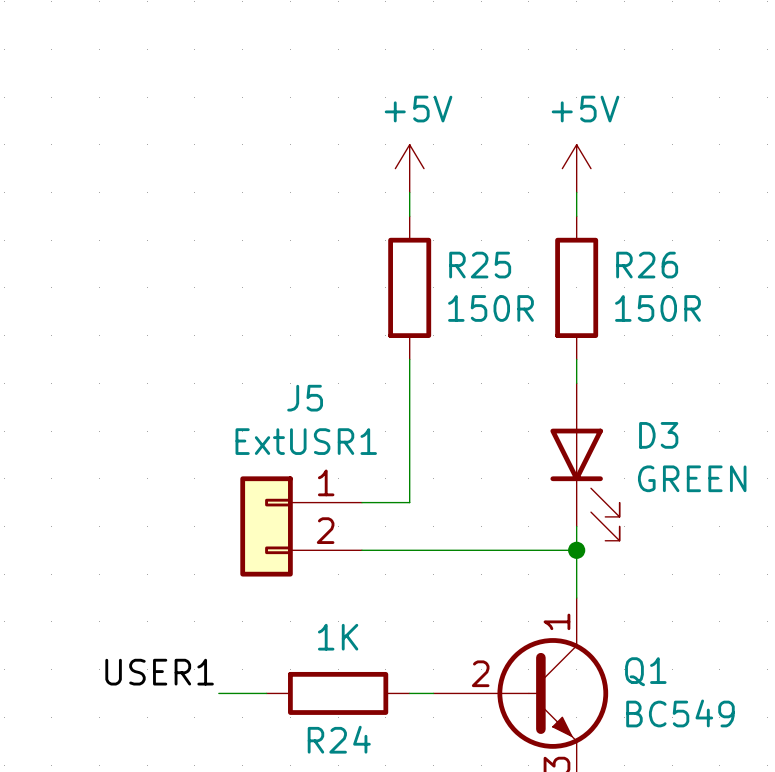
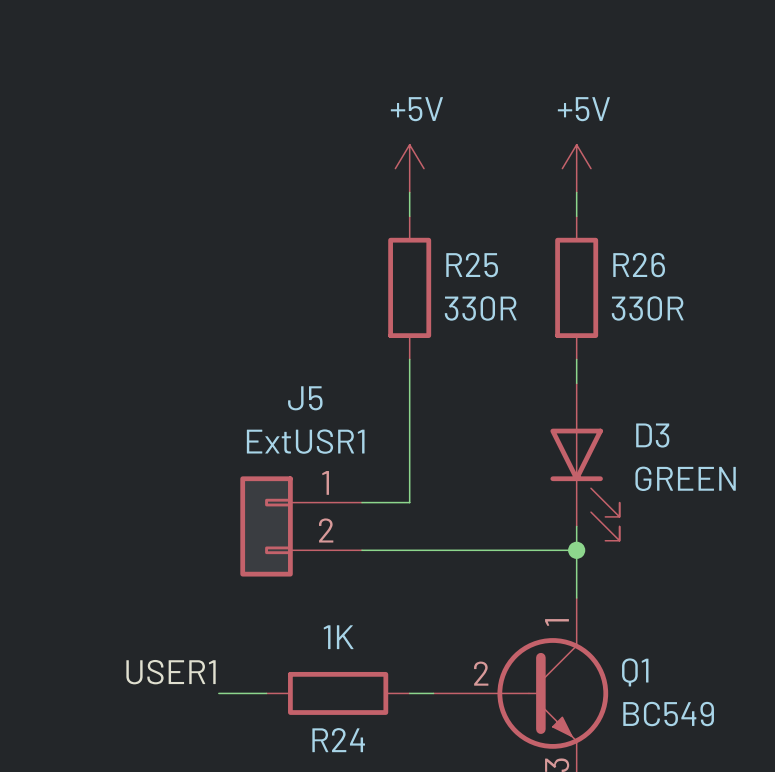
R25 value: 150R (490, 308) -> 330R (480, 308)
R26 value: 150R (657, 308) -> 330R (647, 308)

